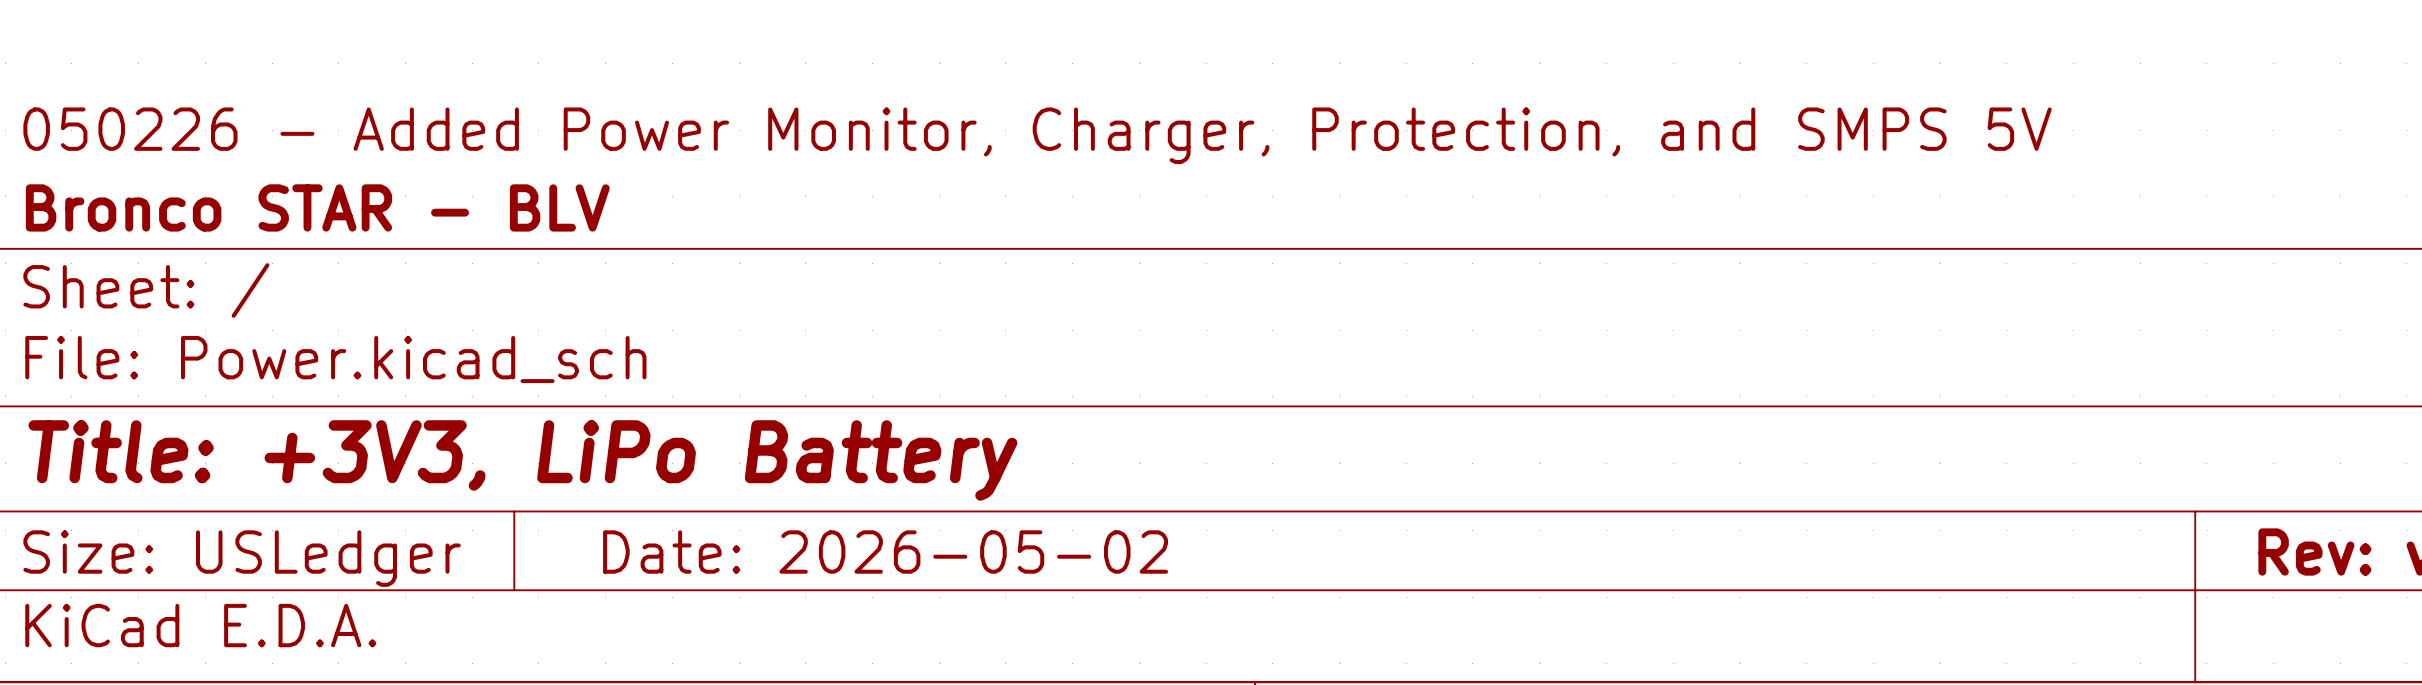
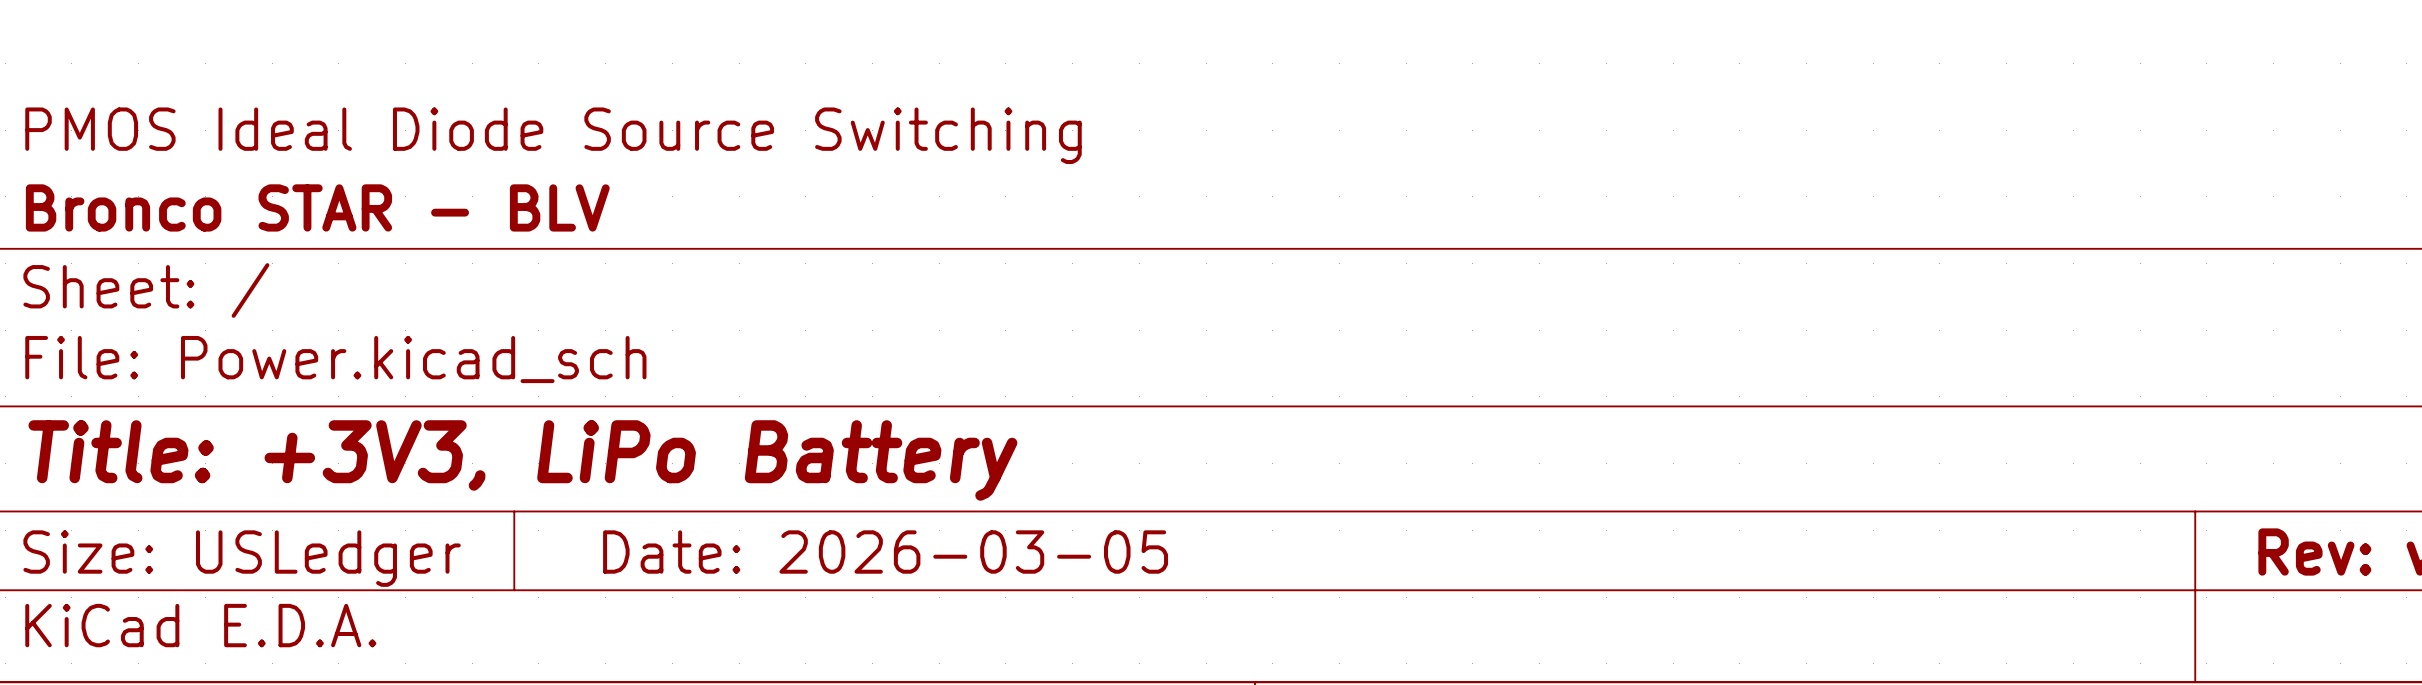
title block: 050226 - Added Power Monitor, Charger, Protection, and SMPS 5V (1037, 135) -> PMOS Ideal Diode Source Switching (553, 135)
title block: Date: 2026-05-02 (885, 552) -> Date: 2026-03-05 (885, 552)

